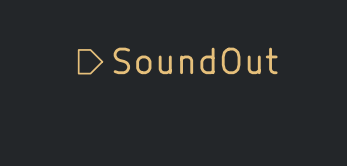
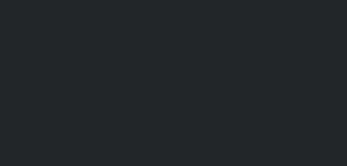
hierarchical label: SoundOut (195, 60) -> none

